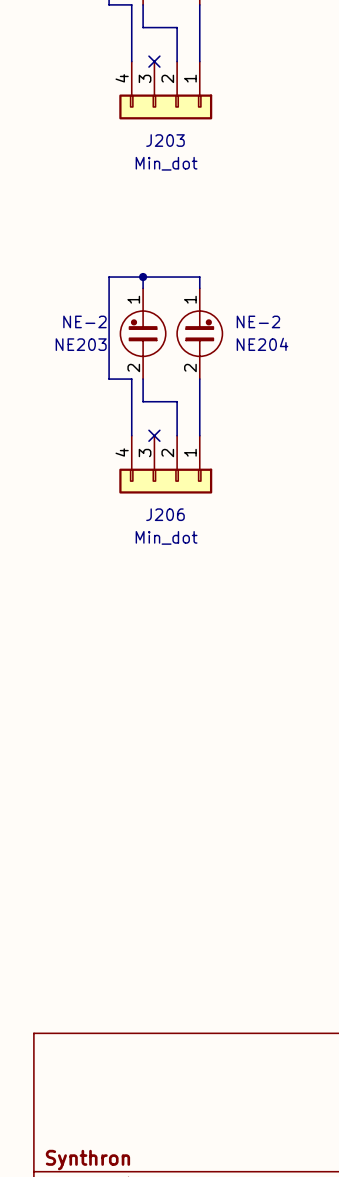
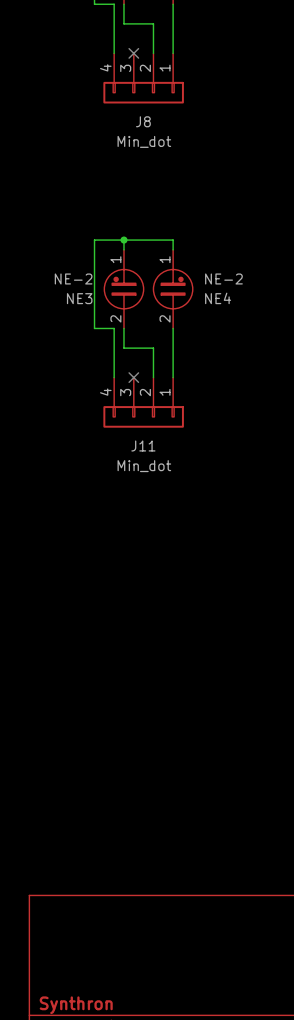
J203 name: J203 (165, 140) -> J8 (143, 121)
NE203 name: NE203 (81, 344) -> NE3 (79, 298)
NE204 name: NE204 (262, 344) -> NE4 (218, 298)
J206 name: J206 (165, 514) -> J11 (143, 446)

